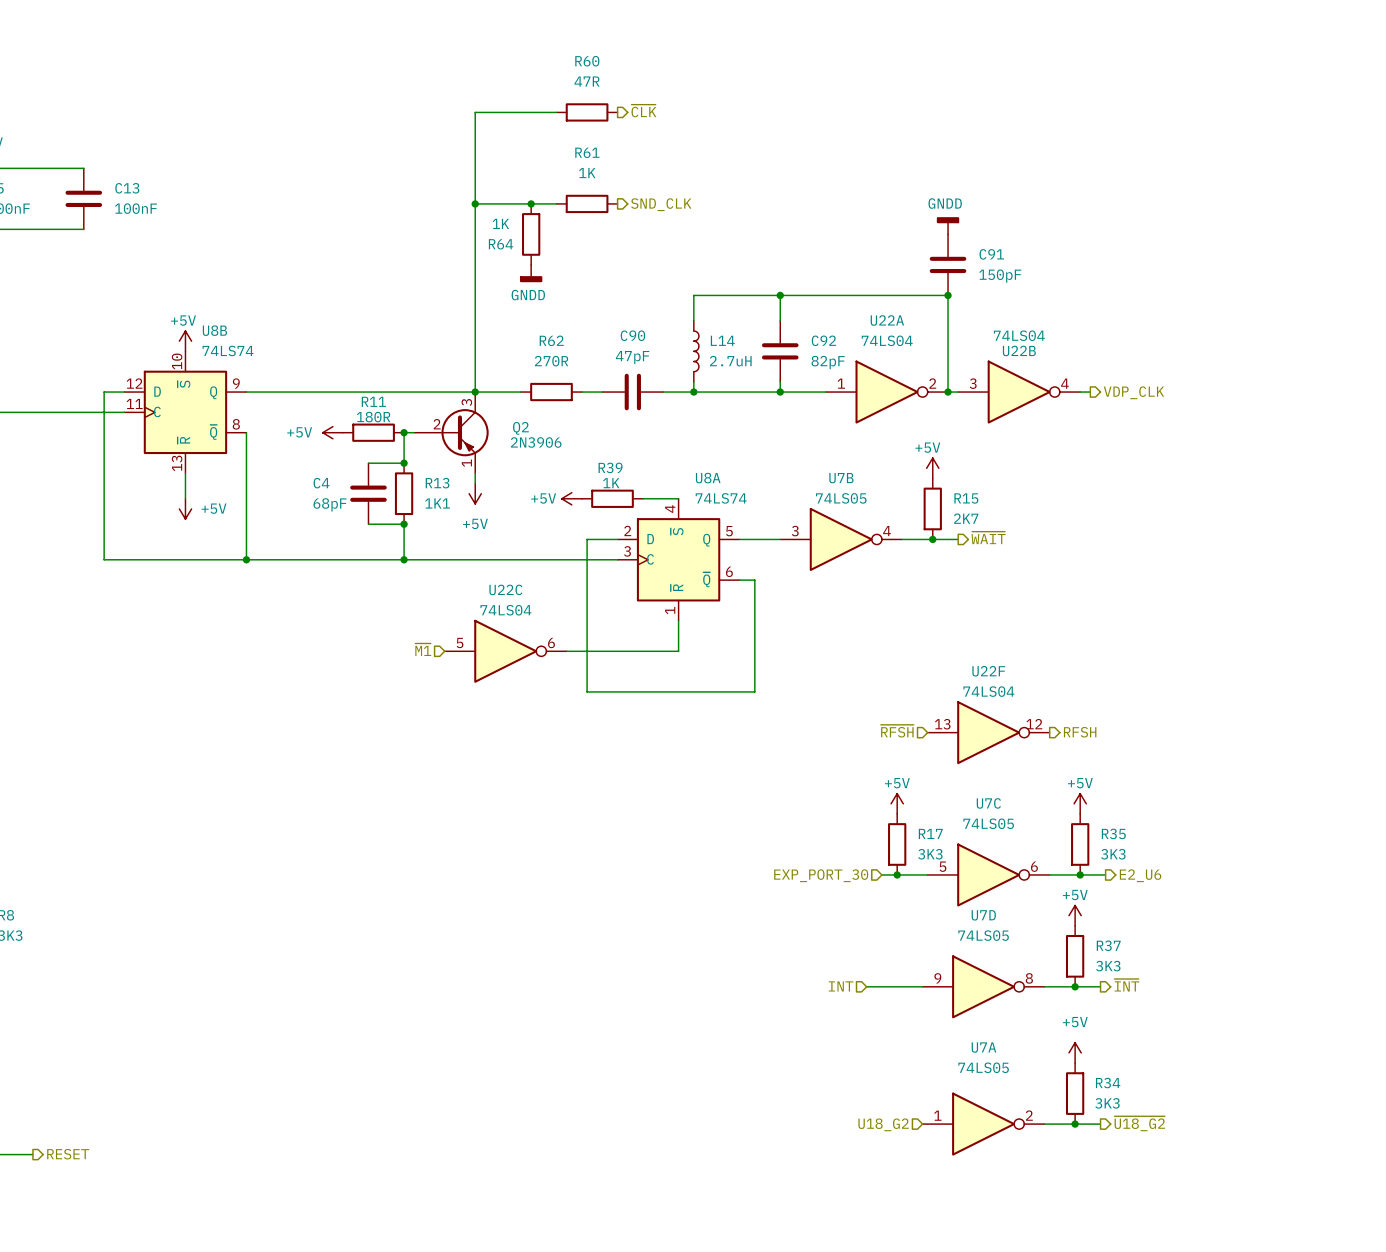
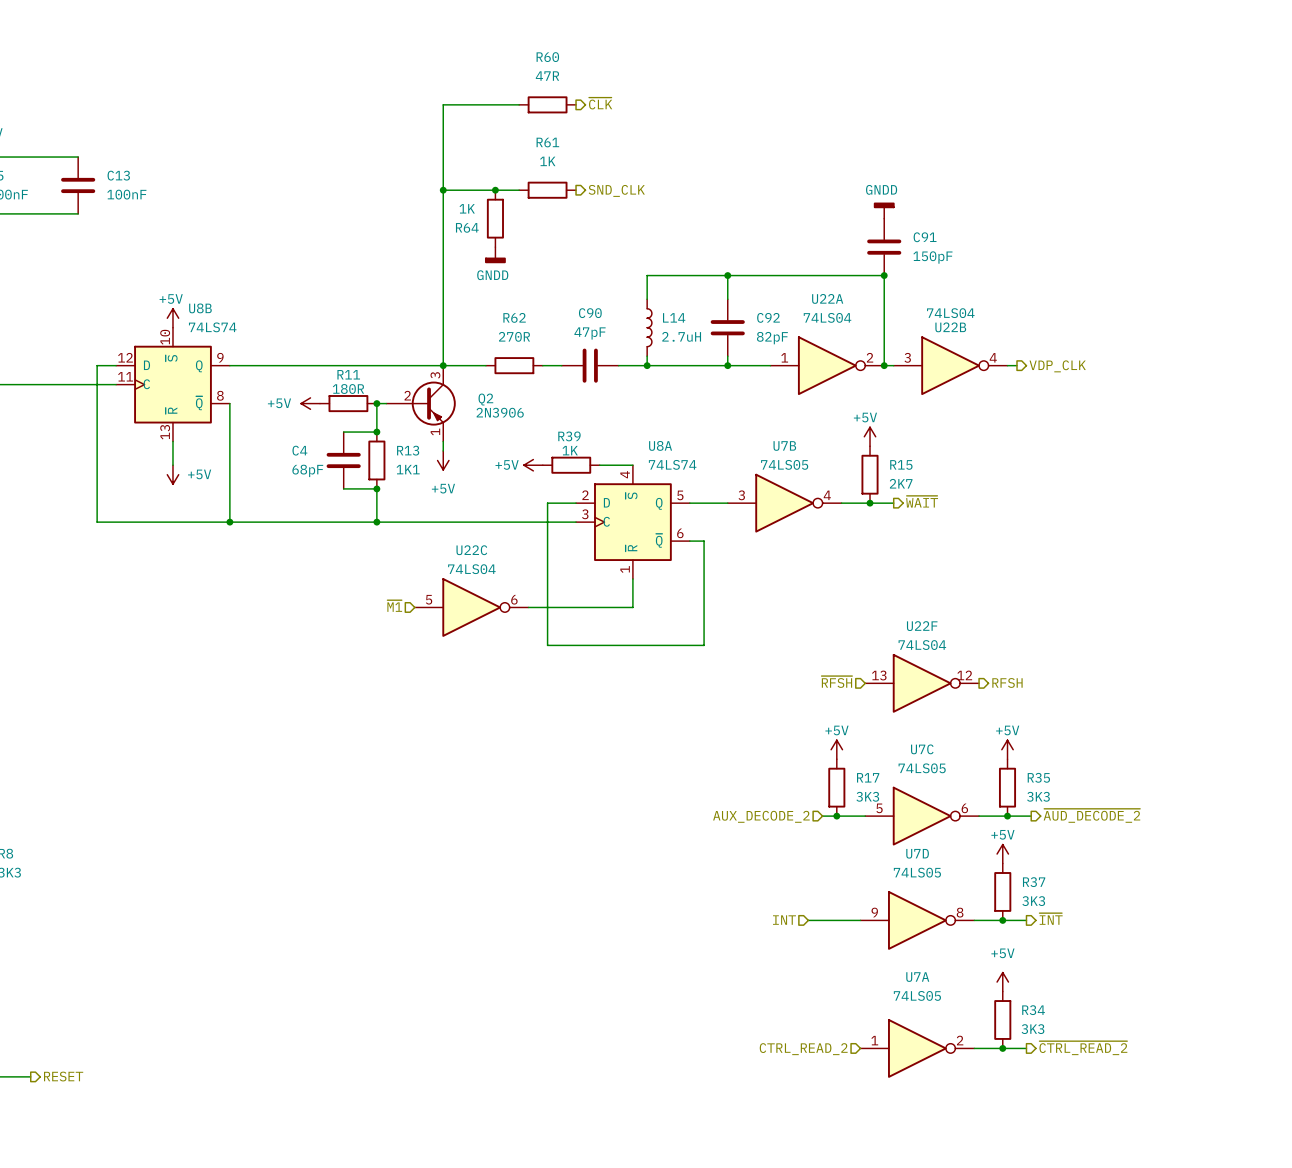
hierarchical label: EXP_PORT_30 (821, 875) -> AUX_DECODE_2 (761, 816)
hierarchical label: E2_U6 (1140, 875) -> ~{AUD_DECODE_2} (1091, 815)
hierarchical label: ~{U18_G2} (1139, 1123) -> ~{CTRL_READ_2} (1083, 1048)
hierarchical label: U18_G2 (883, 1124) -> CTRL_READ_2 (803, 1049)

